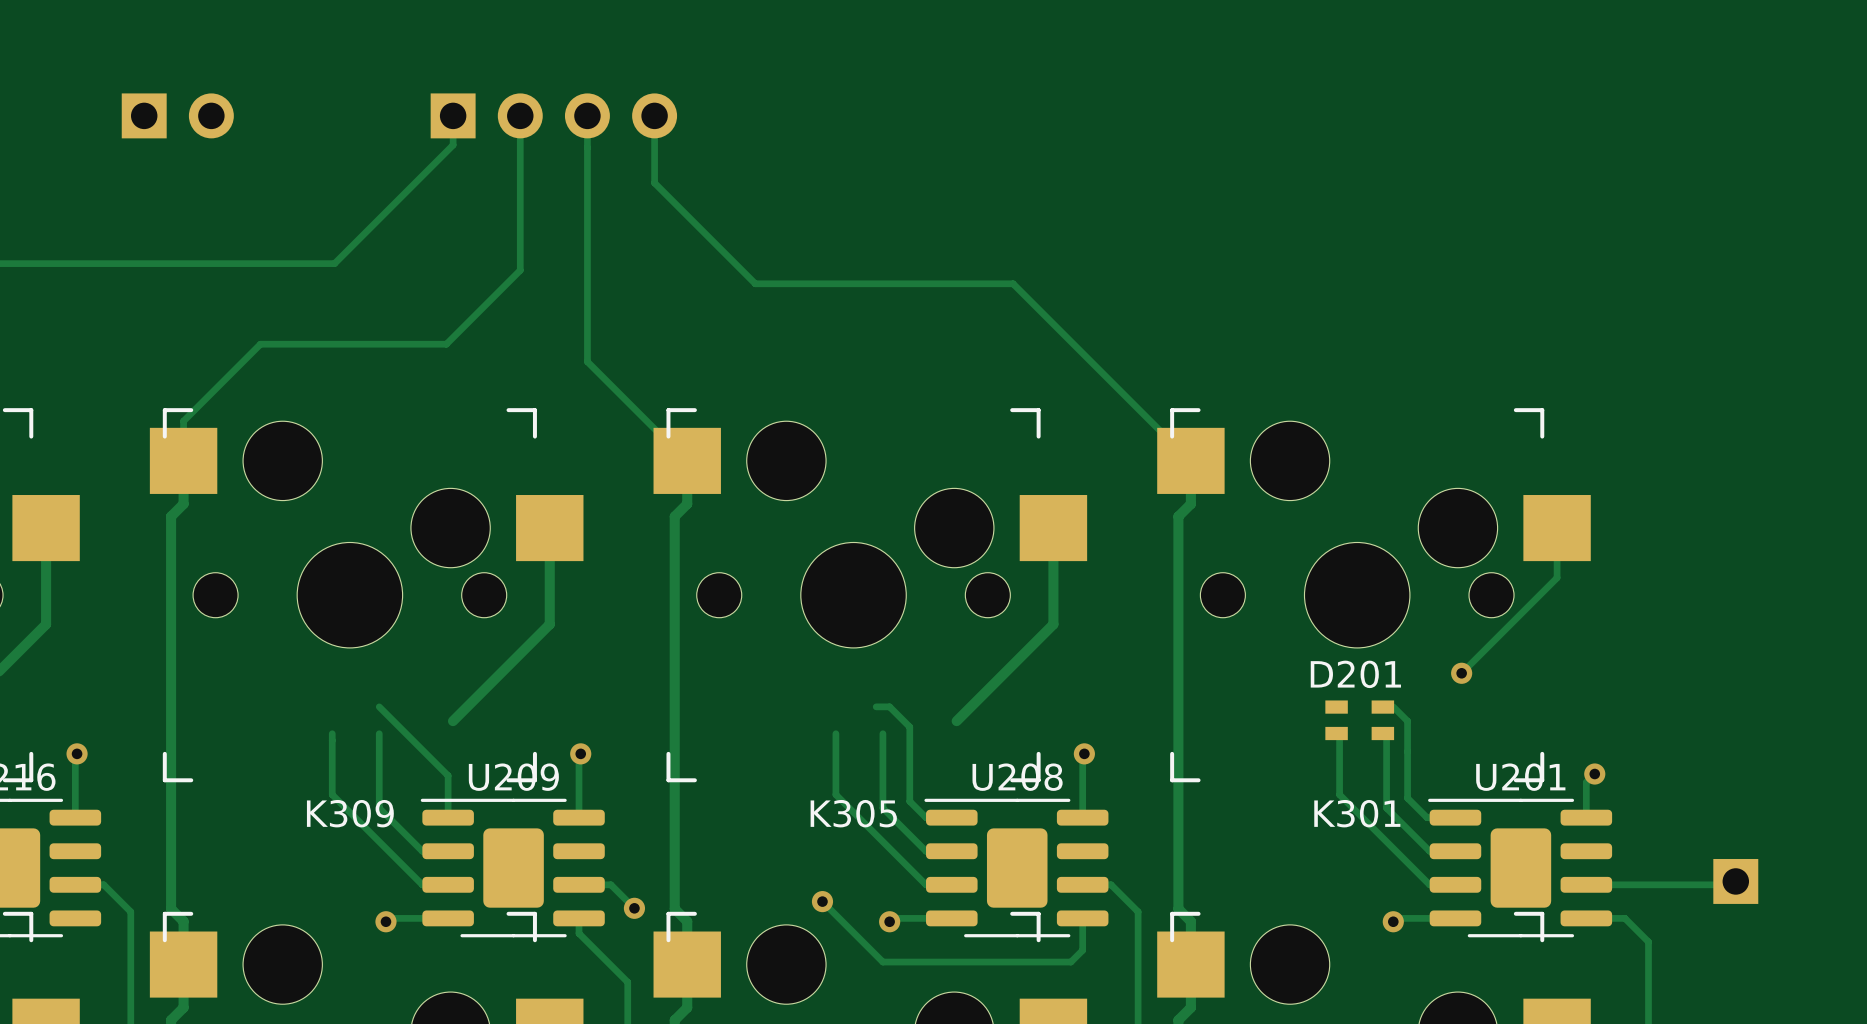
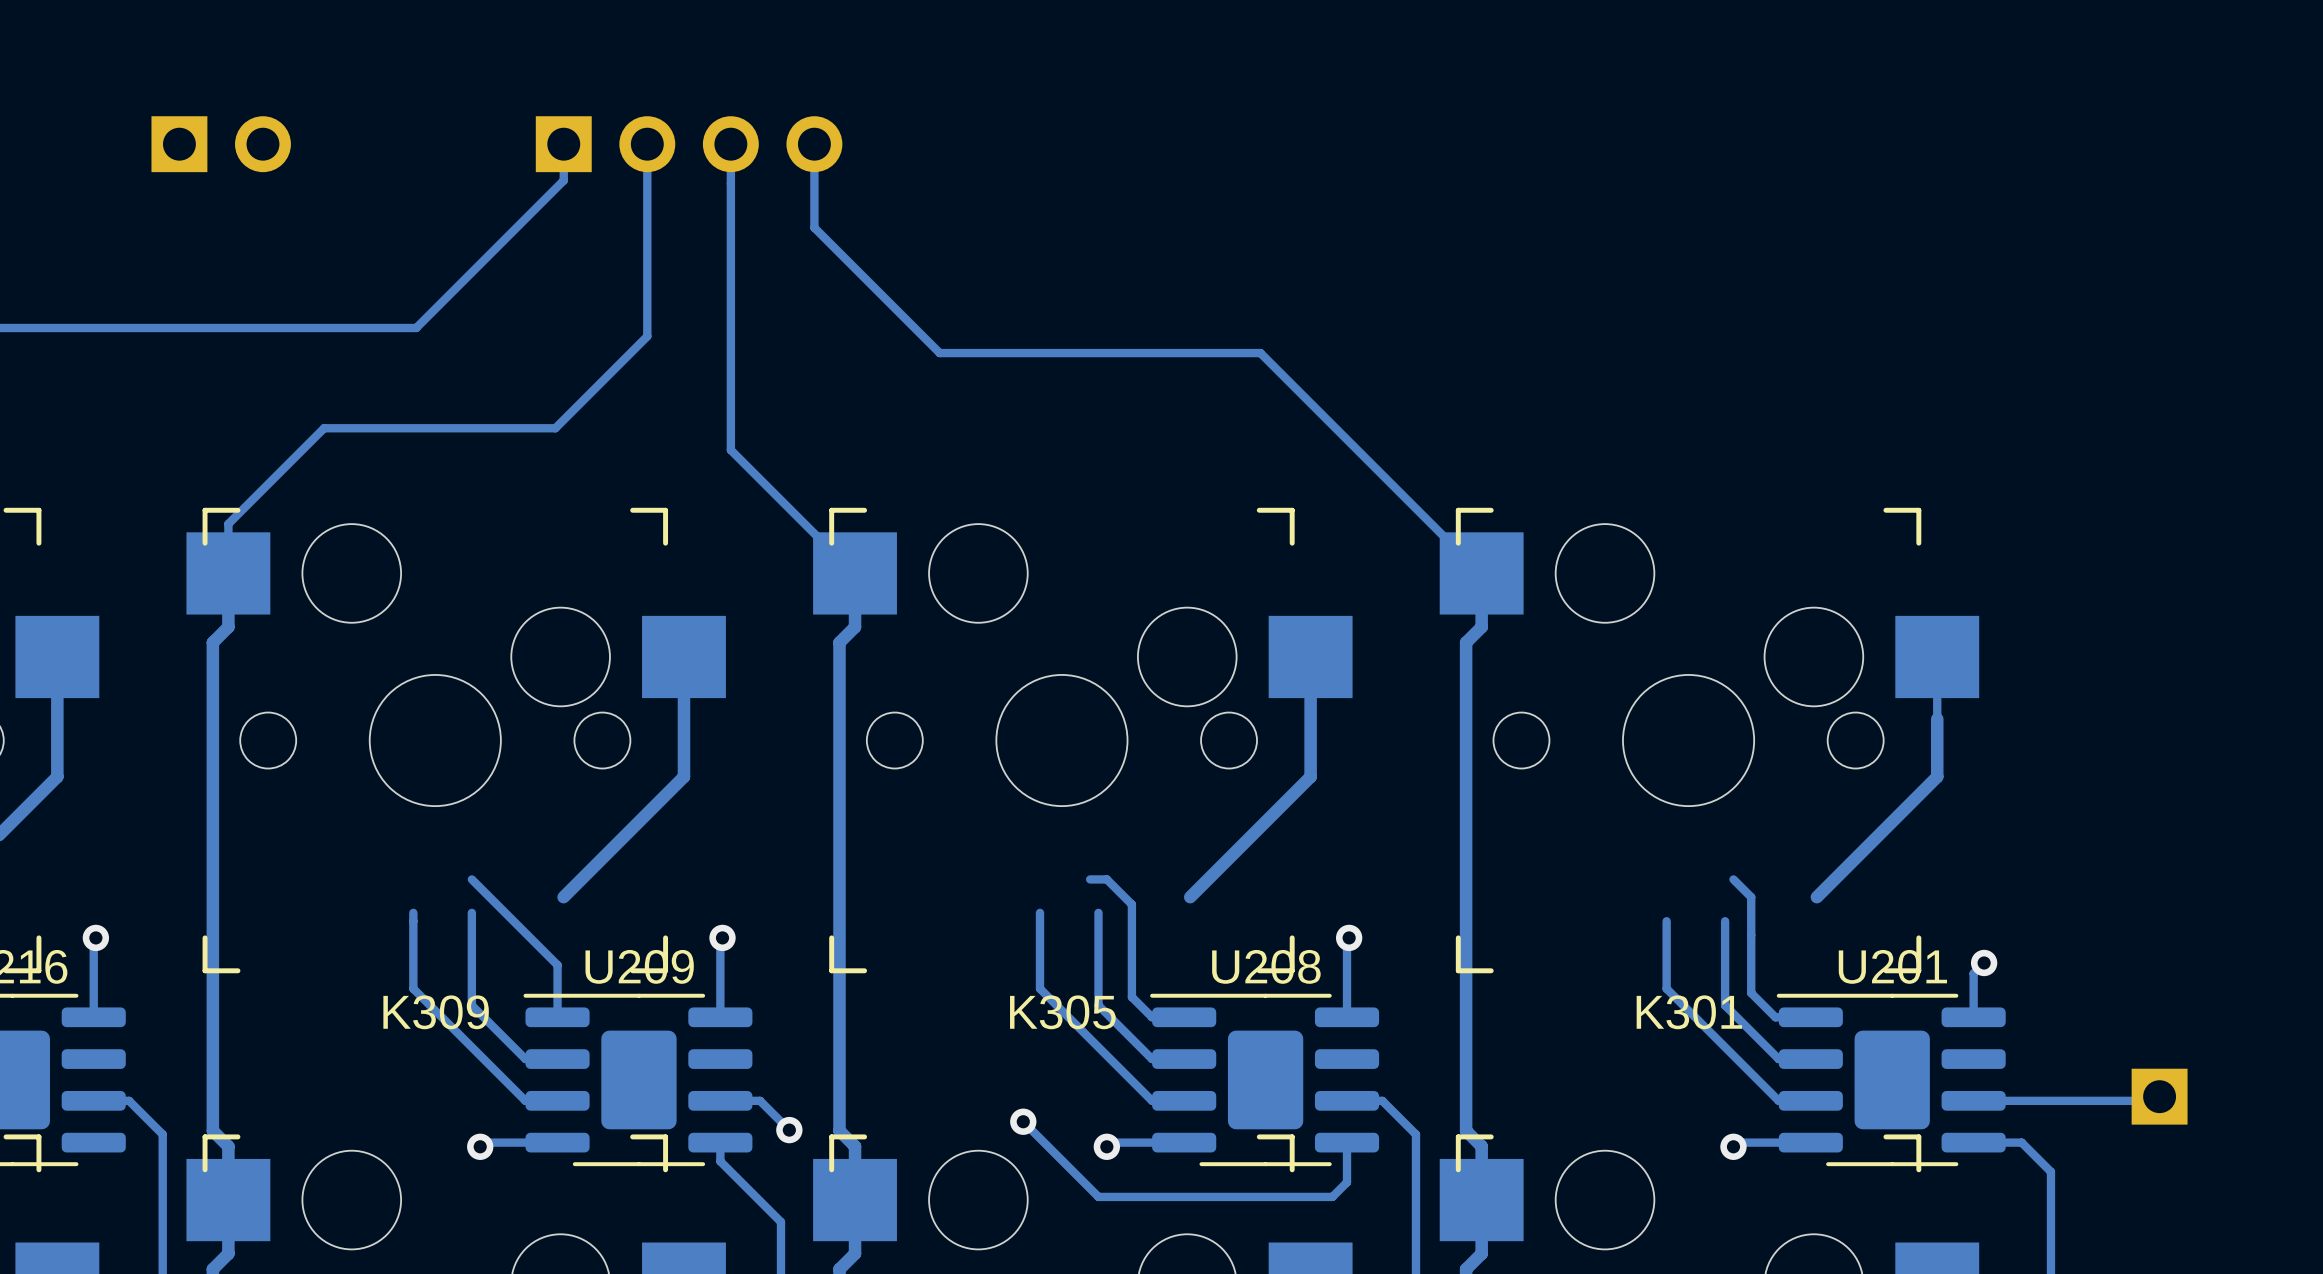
track: (1557, 577) (1461, 673) -> (1937, 718) (1937, 776) (1816, 897)
via: (1461, 673) -> none
D201: (1359, 720) -> none

